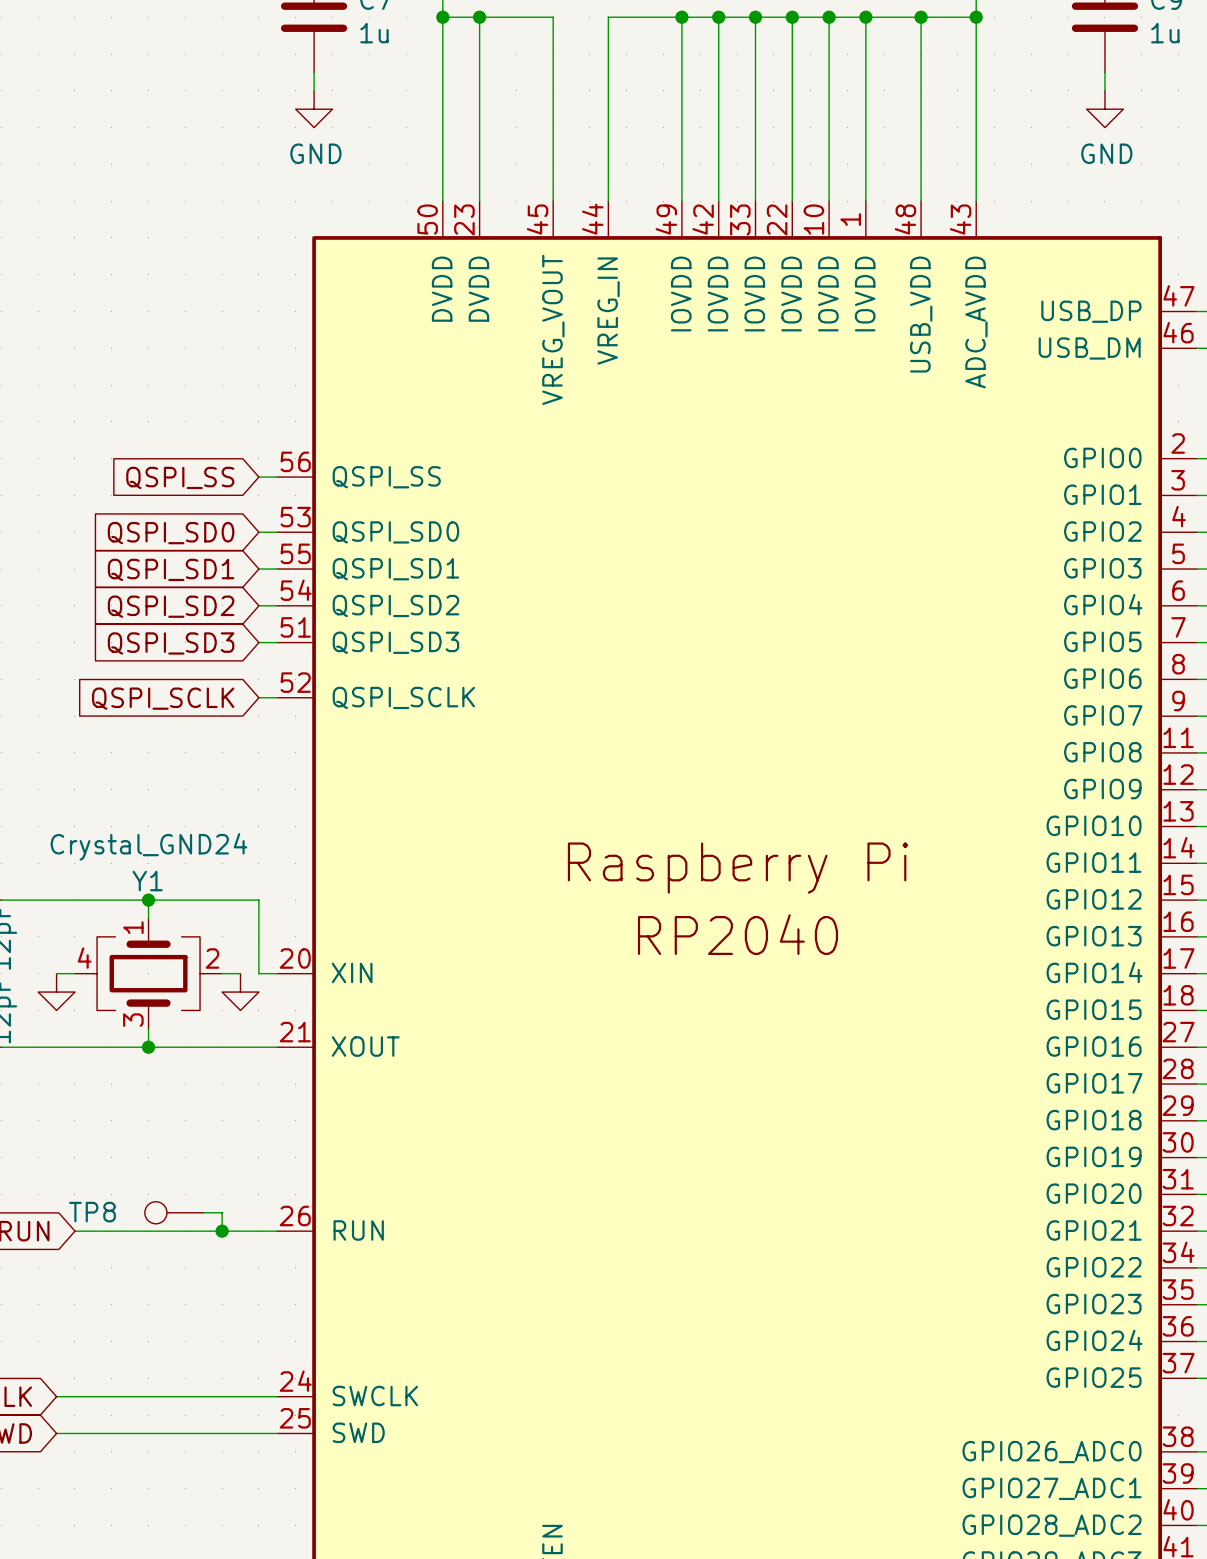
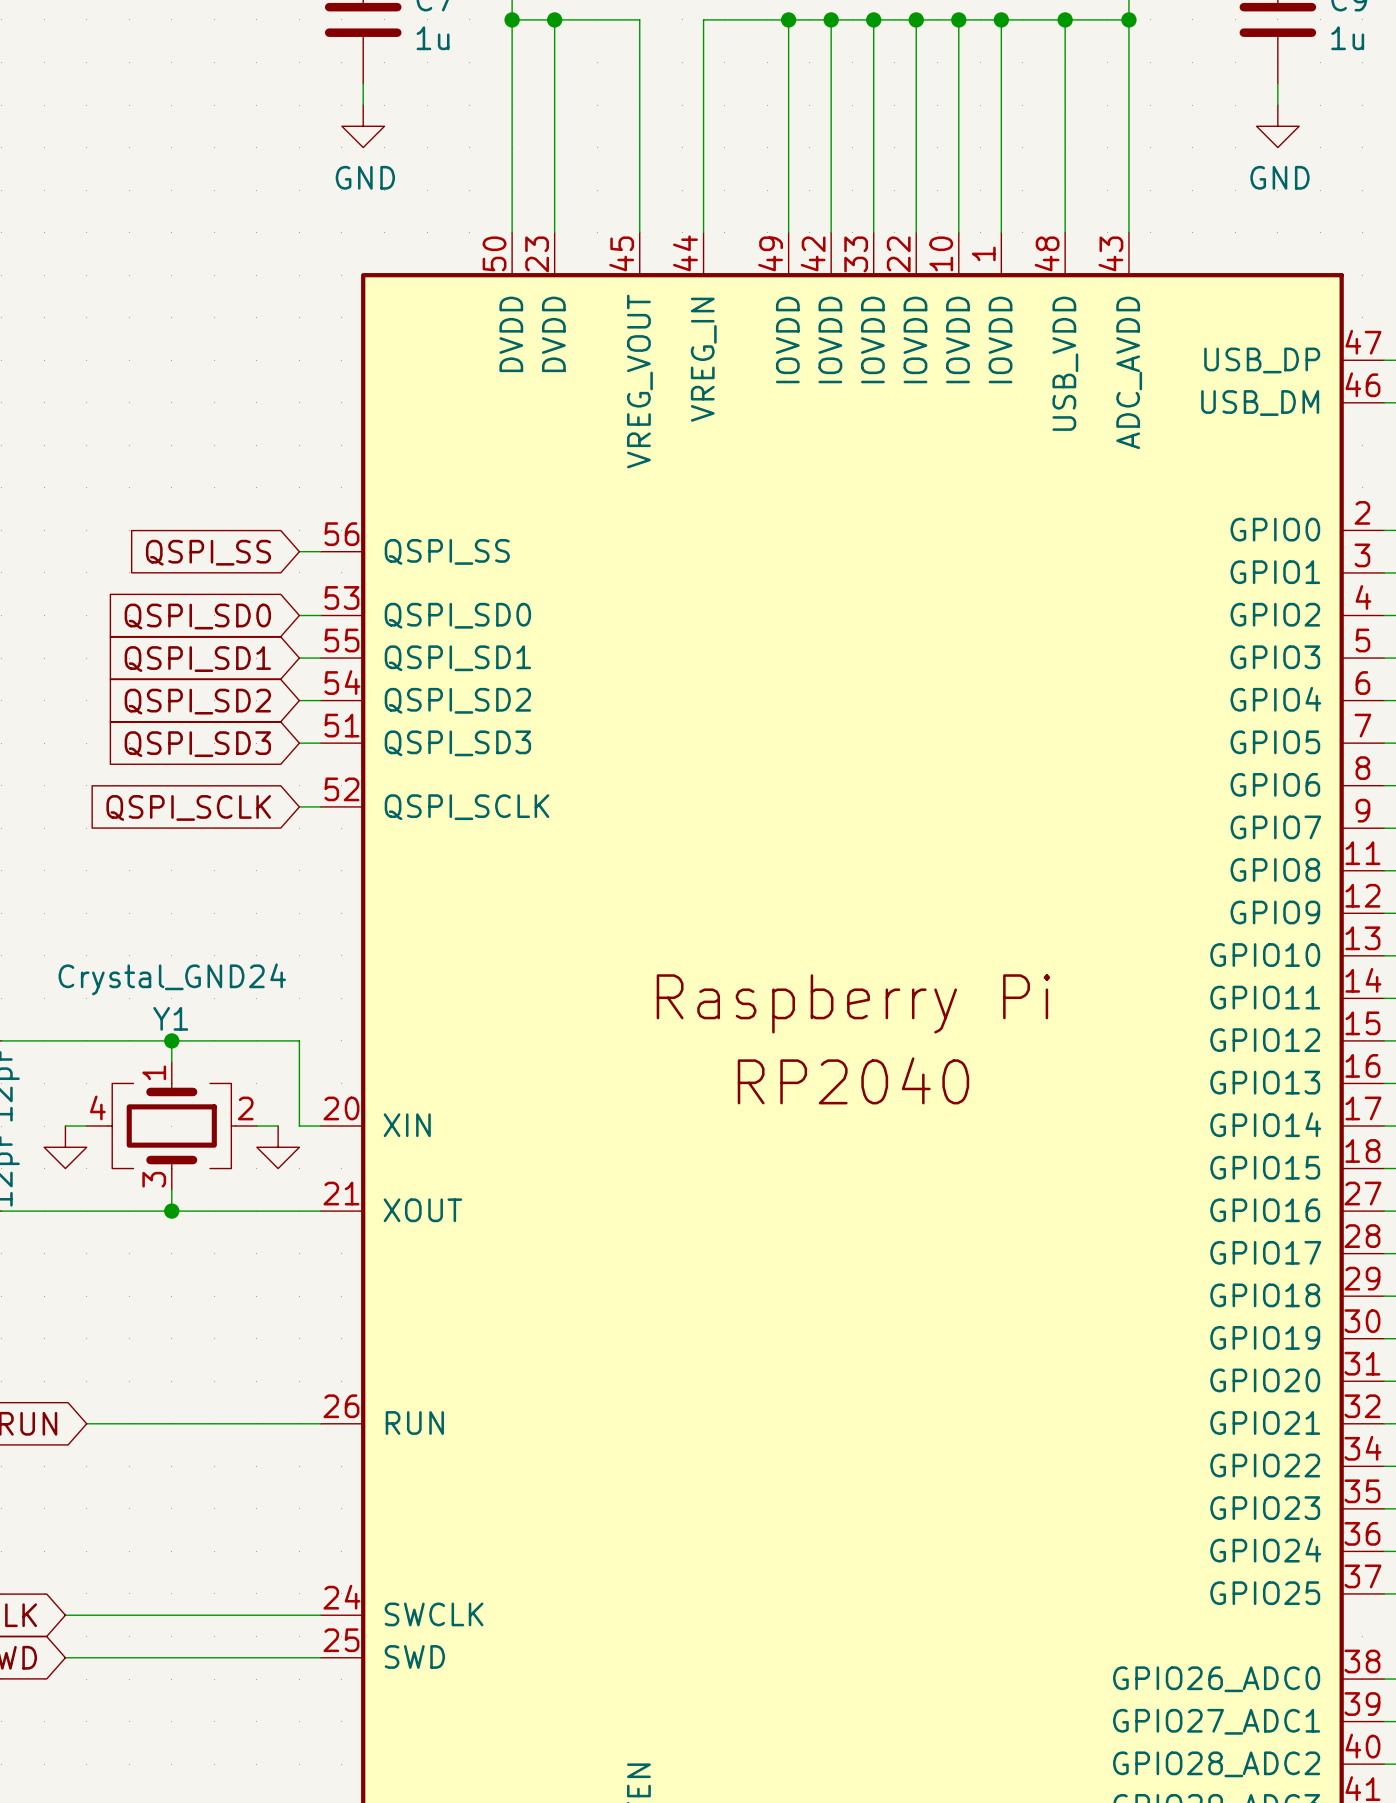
TP8: (174, 1212) -> none
wire: (203, 1212) (222, 1212) (222, 1231) -> none
junction: (222, 1231) -> none

